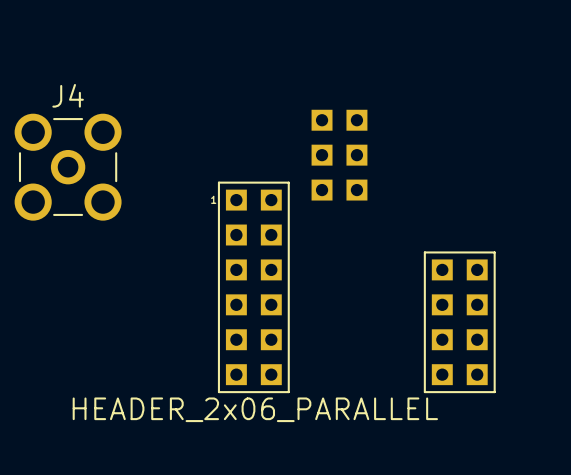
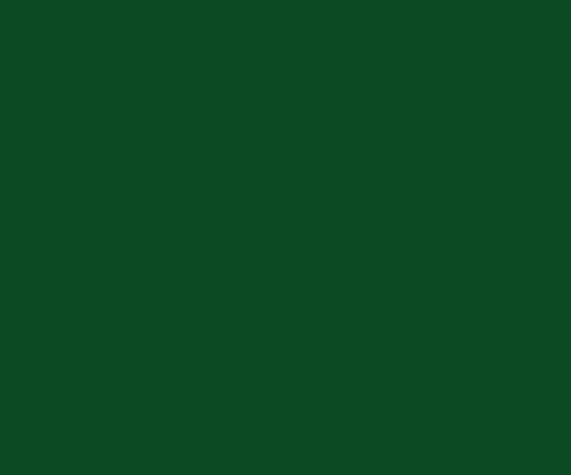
part: (339, 155) -> none
J4: (68, 167) -> none
part: HEADER_2x06_PARALLEL (253, 287) -> none
part: (459, 322) -> none

